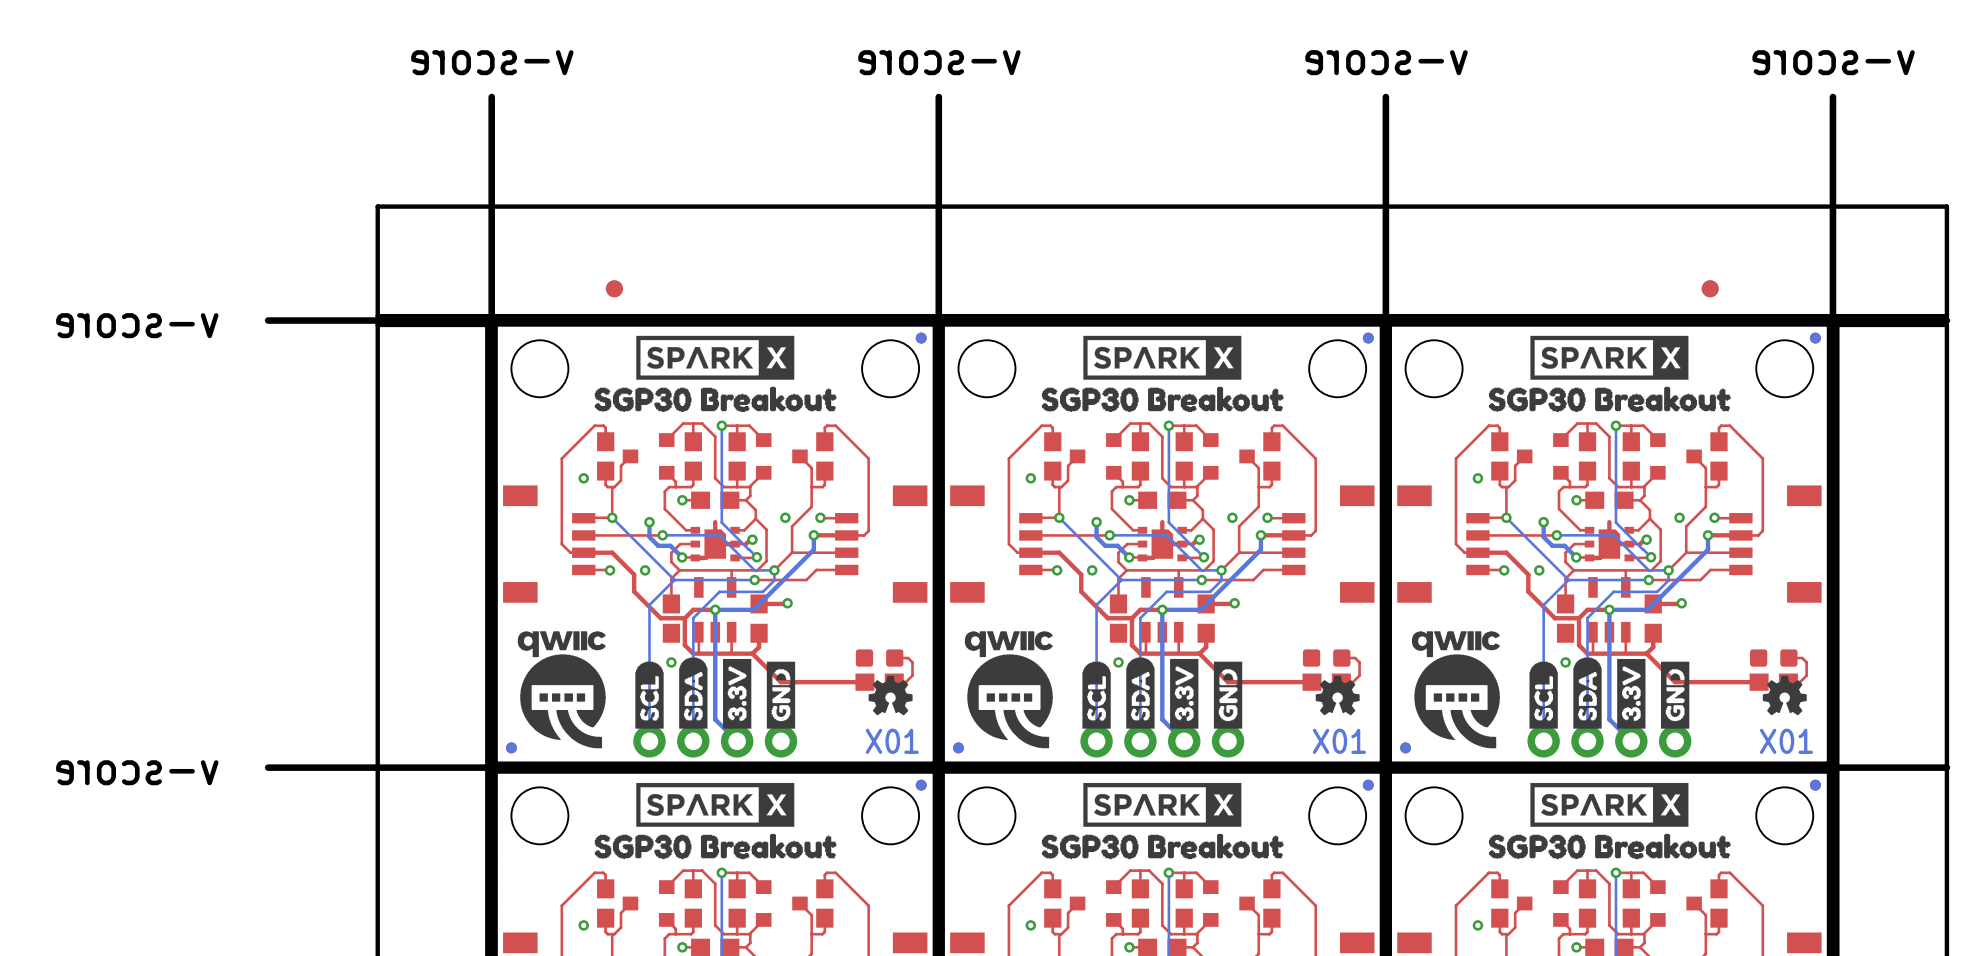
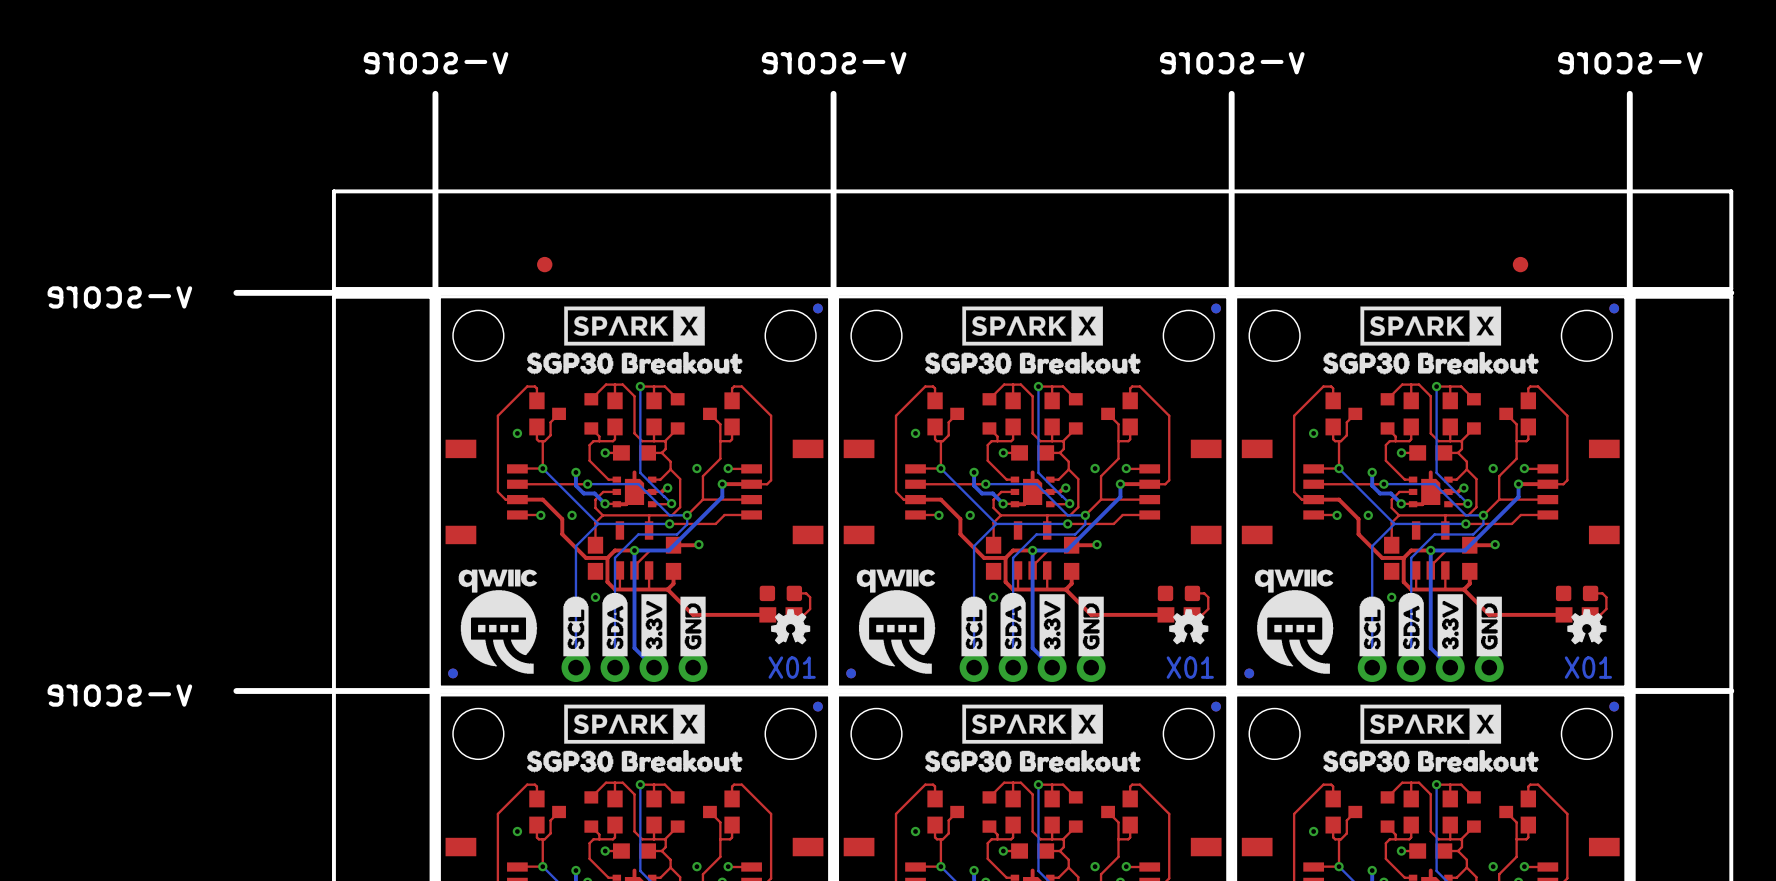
top track: none -> (650, 550) (634, 566) (634, 570)
top track: none -> (1048, 550) (1032, 566) (1032, 570)
top track: none -> (1446, 550) (1430, 566) (1430, 570)

